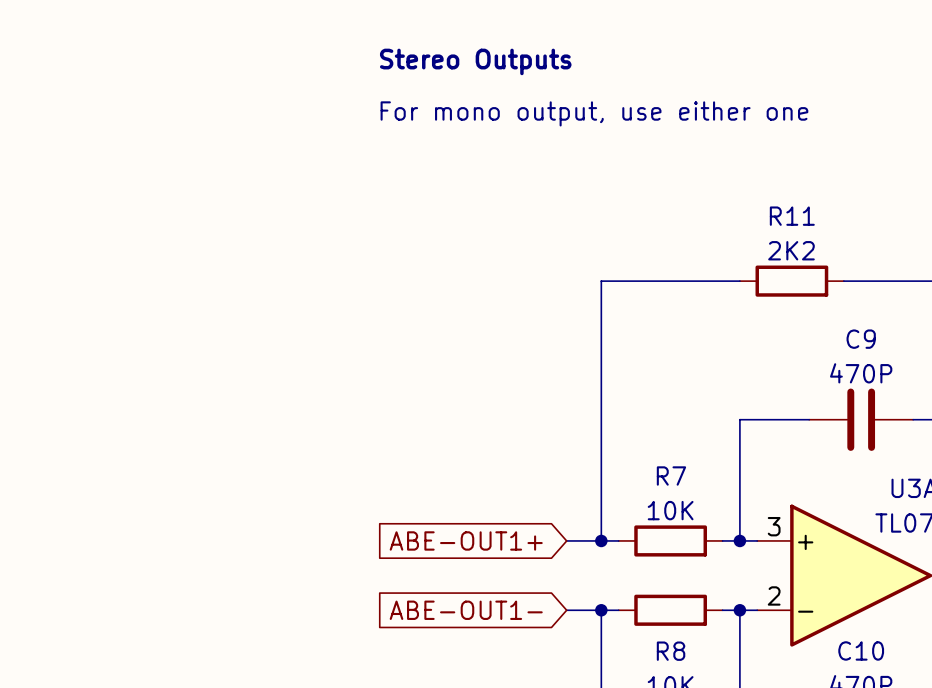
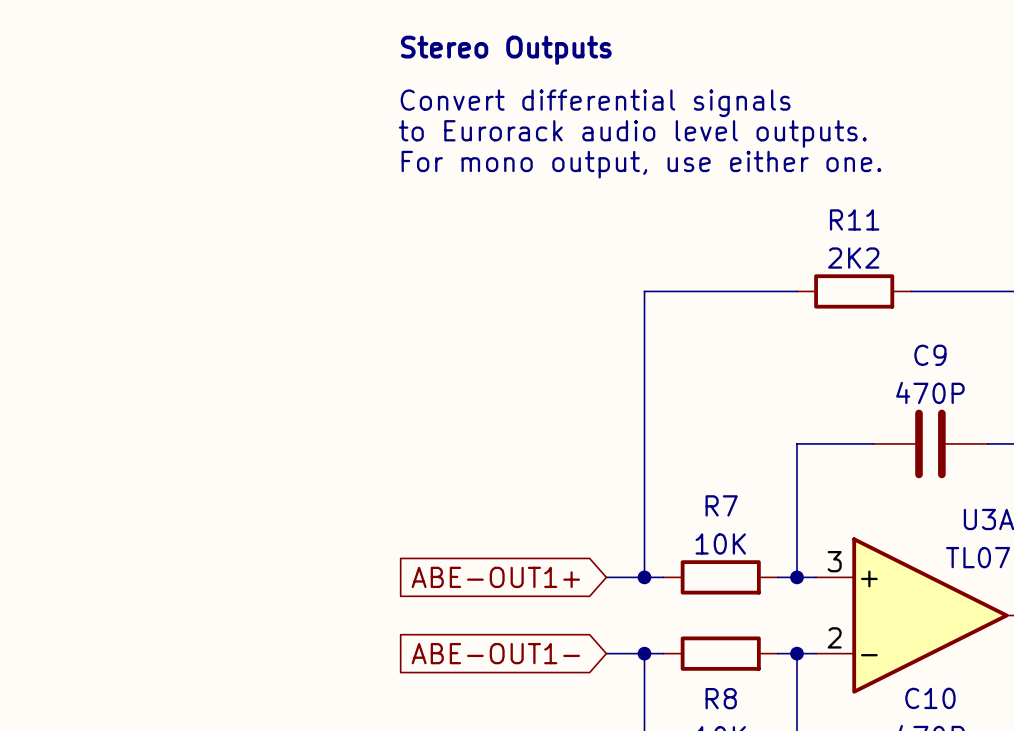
text: For mono output, use either one (594, 113) -> Convert differential signals (595, 103)
text: none -> to Eurorack audio level outputs. (632, 133)
text: none -> For mono output, use either one. (641, 164)

